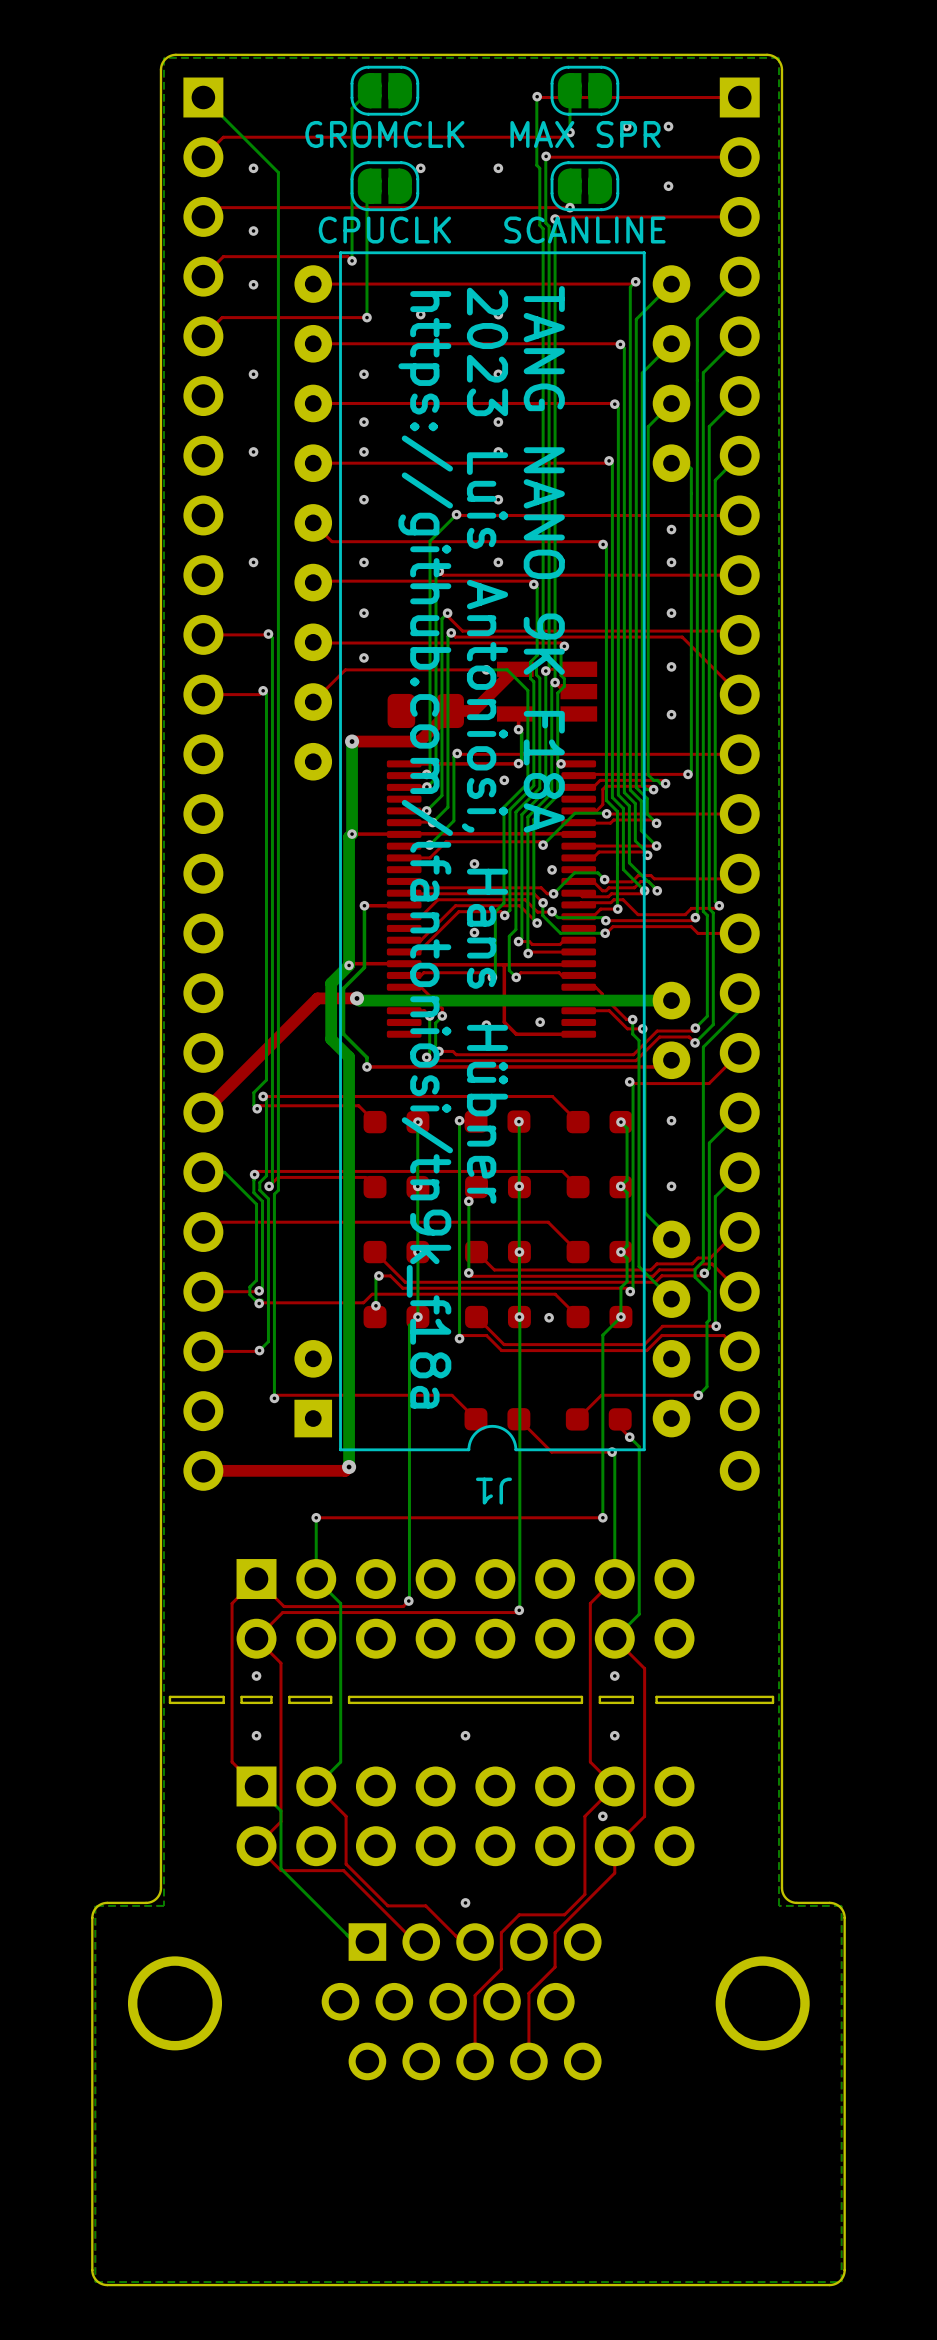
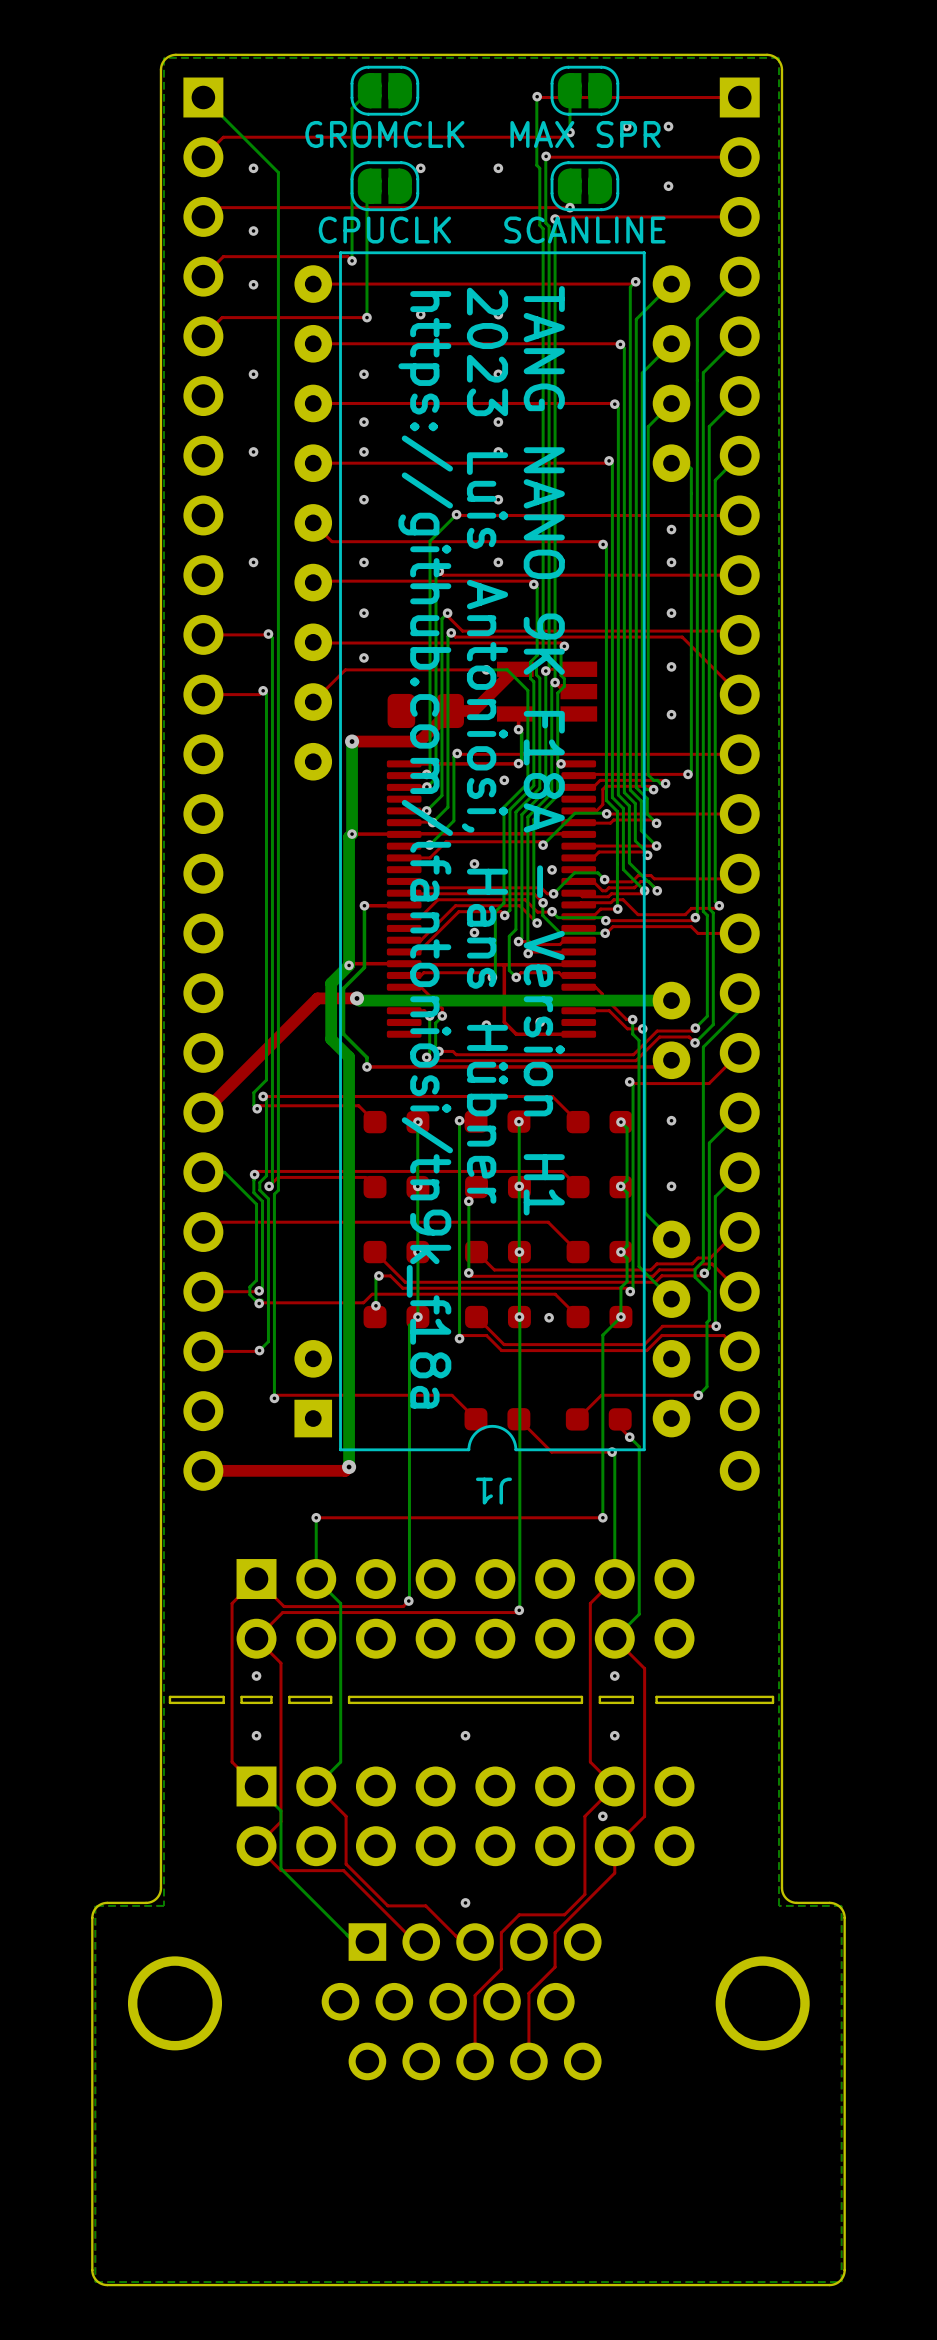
text: TANG NANO 9K F18A (544, 559) -> TANG NANO 9K F18A - Version H1 (544, 750)

